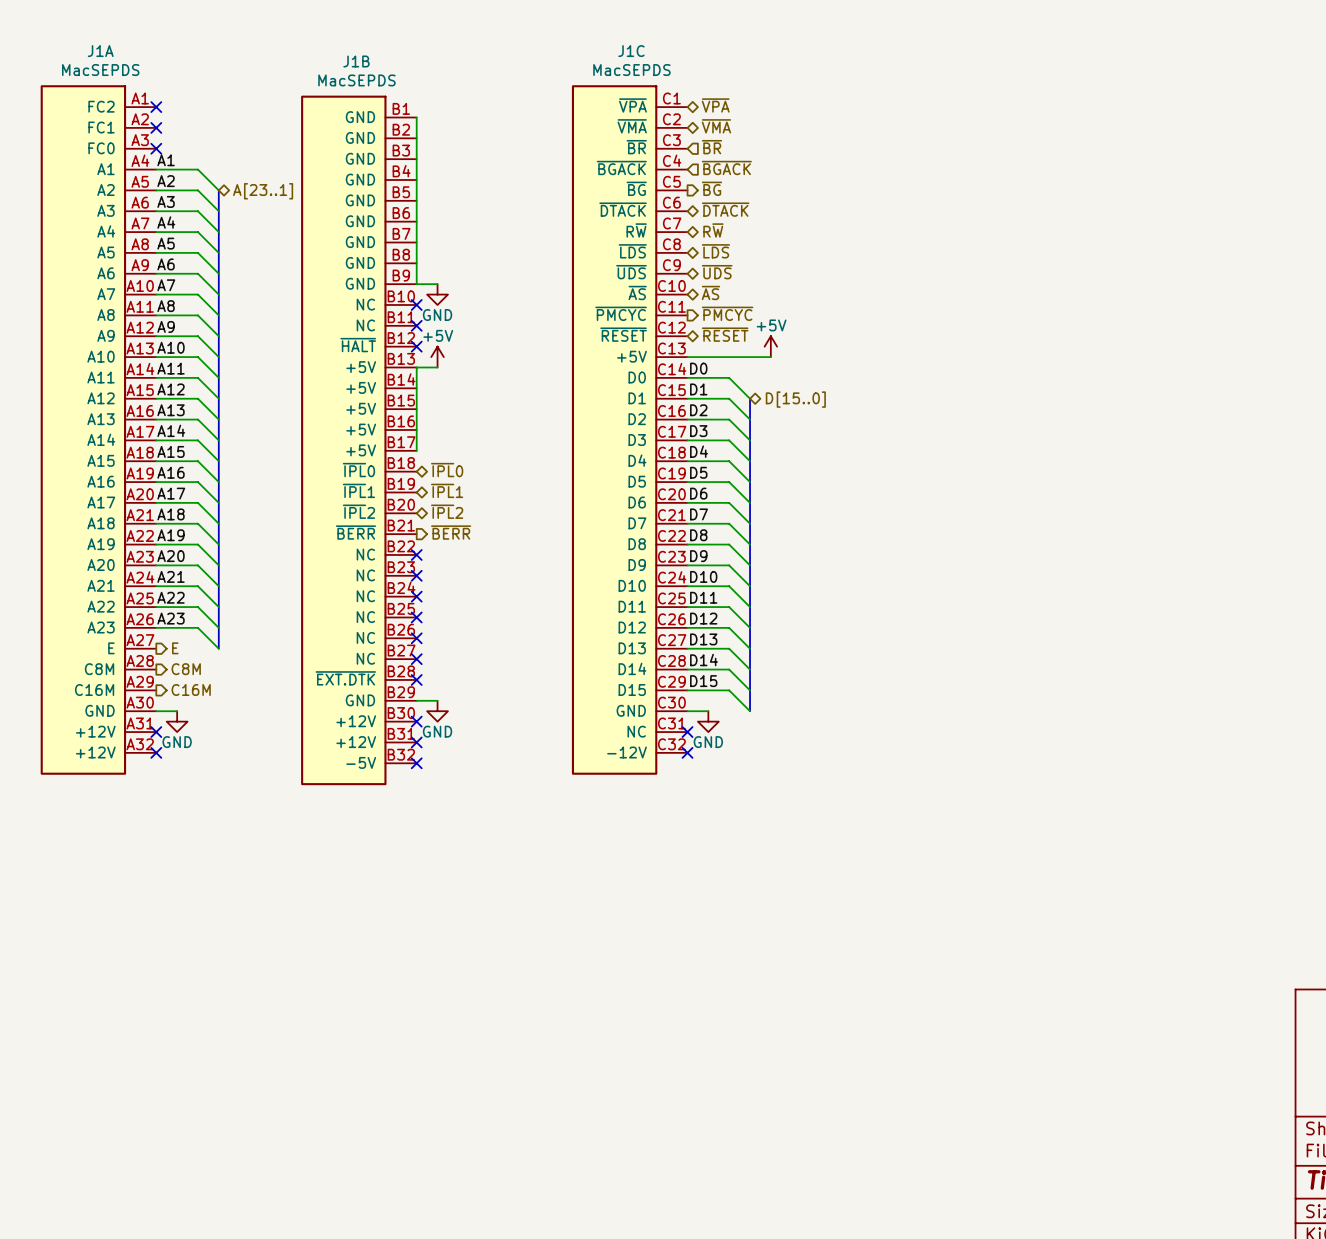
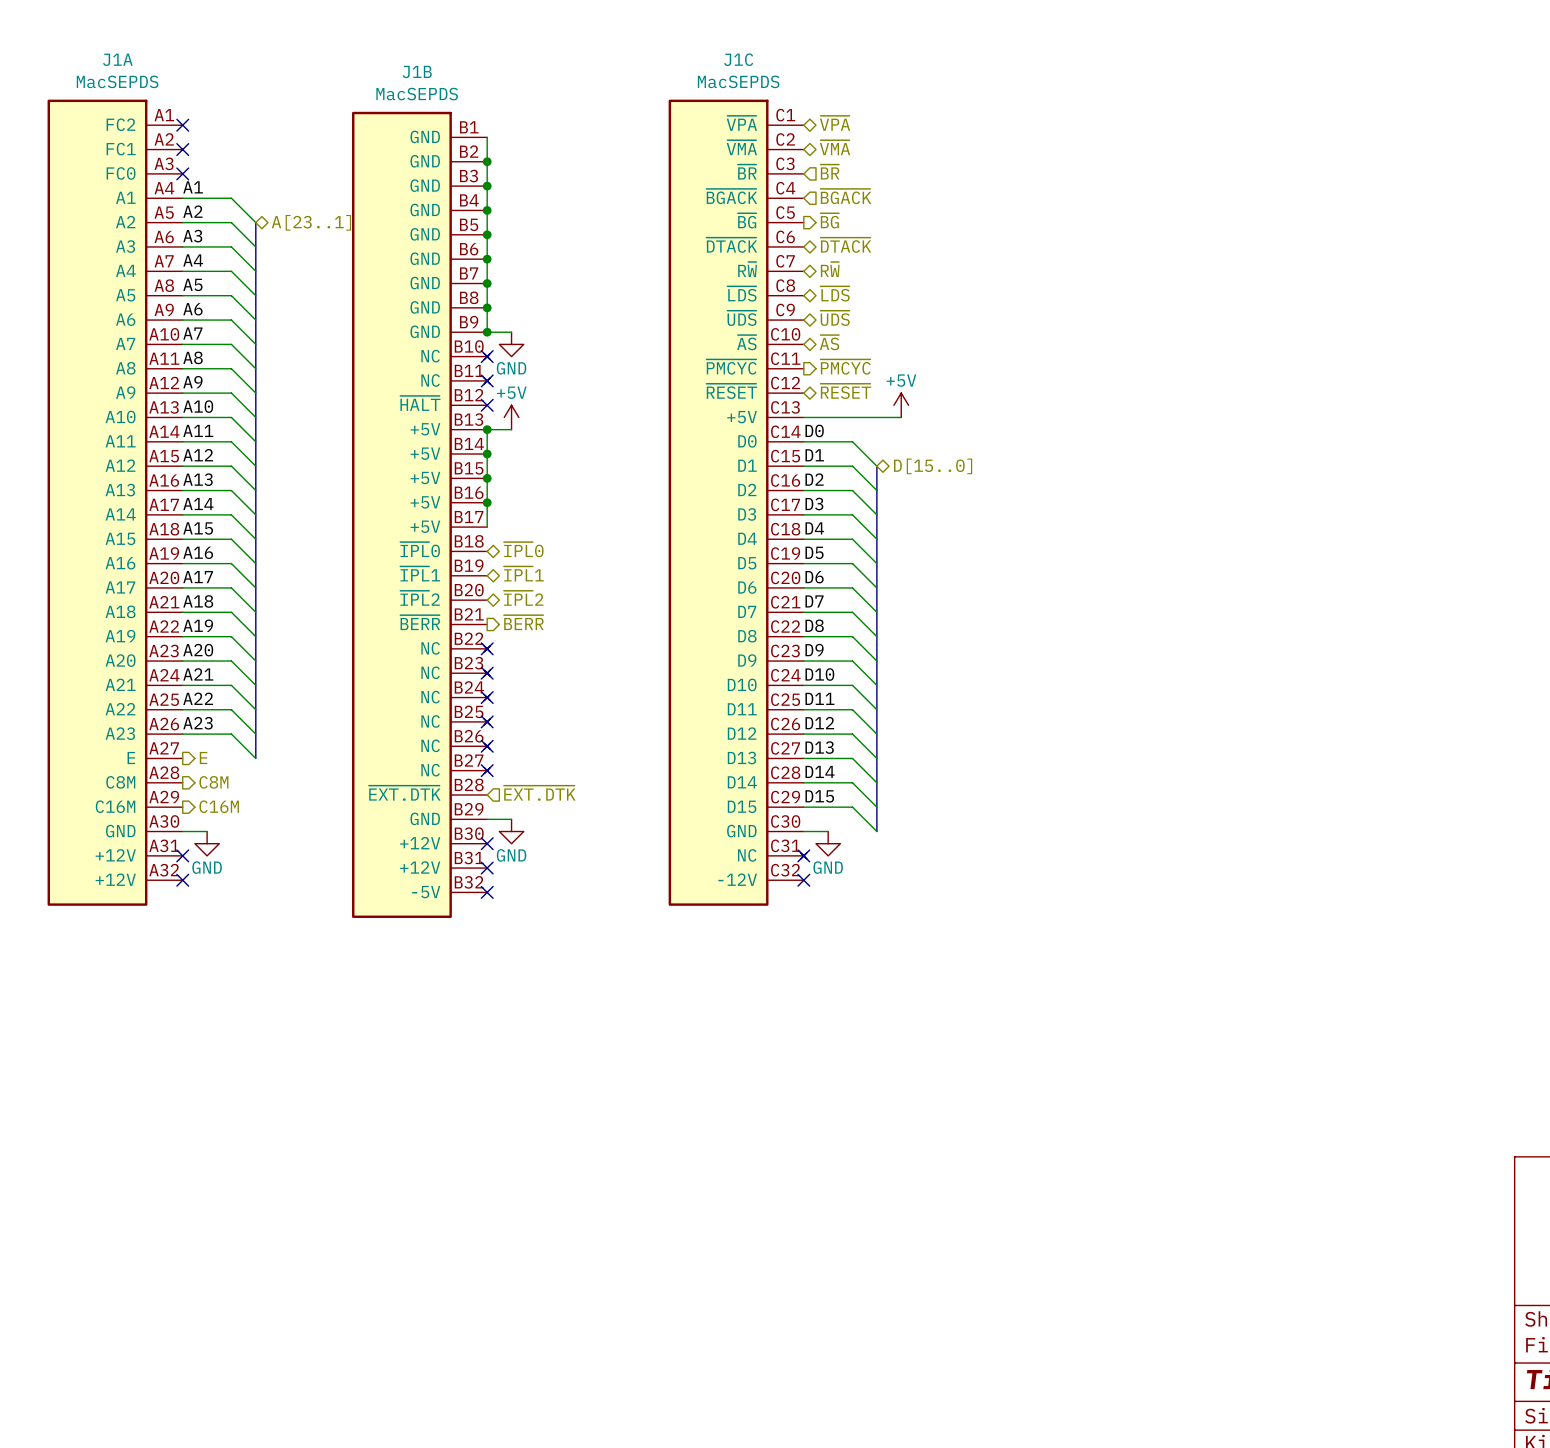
J1C symbol: [571, 85, 688, 775] -> [668, 99, 807, 906]
J1B symbol: [301, 95, 417, 786] -> [352, 111, 491, 918]
junction: none -> (487, 161)
junction: none -> (487, 186)
junction: none -> (487, 210)
junction: none -> (487, 234)
junction: none -> (487, 259)
junction: none -> (487, 283)
junction: none -> (487, 307)
junction: none -> (487, 332)
junction: none -> (487, 429)
junction: none -> (487, 454)
junction: none -> (487, 478)
junction: none -> (487, 502)
hierarchical label: none -> ~{EXT.DTK} (539, 793)
no-connect mark: (416, 679) -> none

